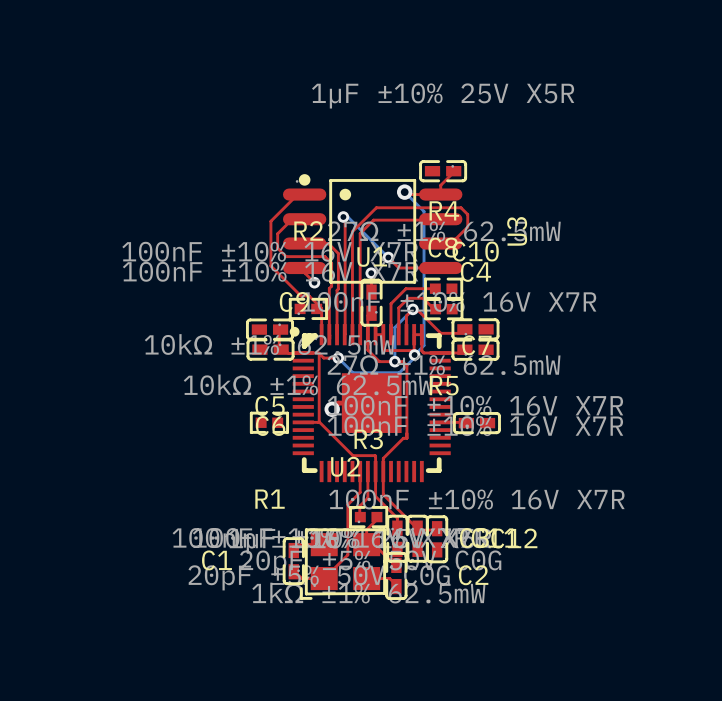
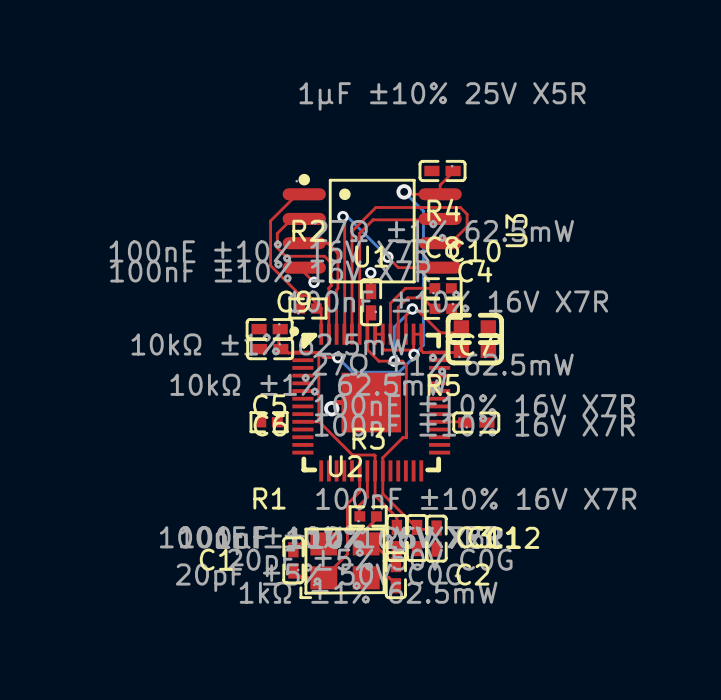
C10 footprint: [451, 318, 500, 341] -> [445, 312, 505, 345]
C4 footprint: [451, 338, 500, 361] -> [445, 333, 505, 366]

